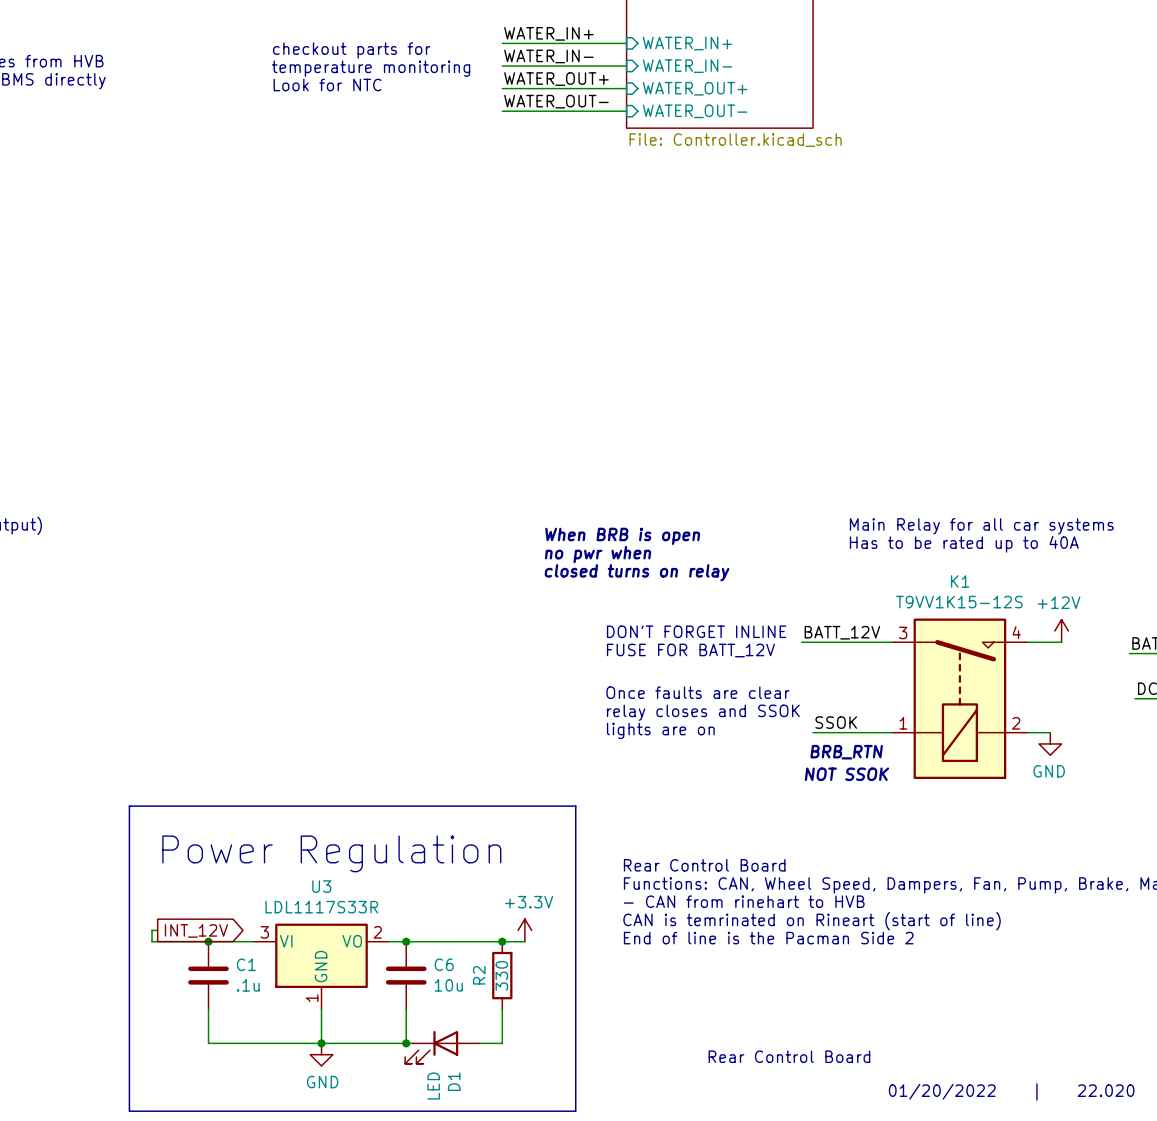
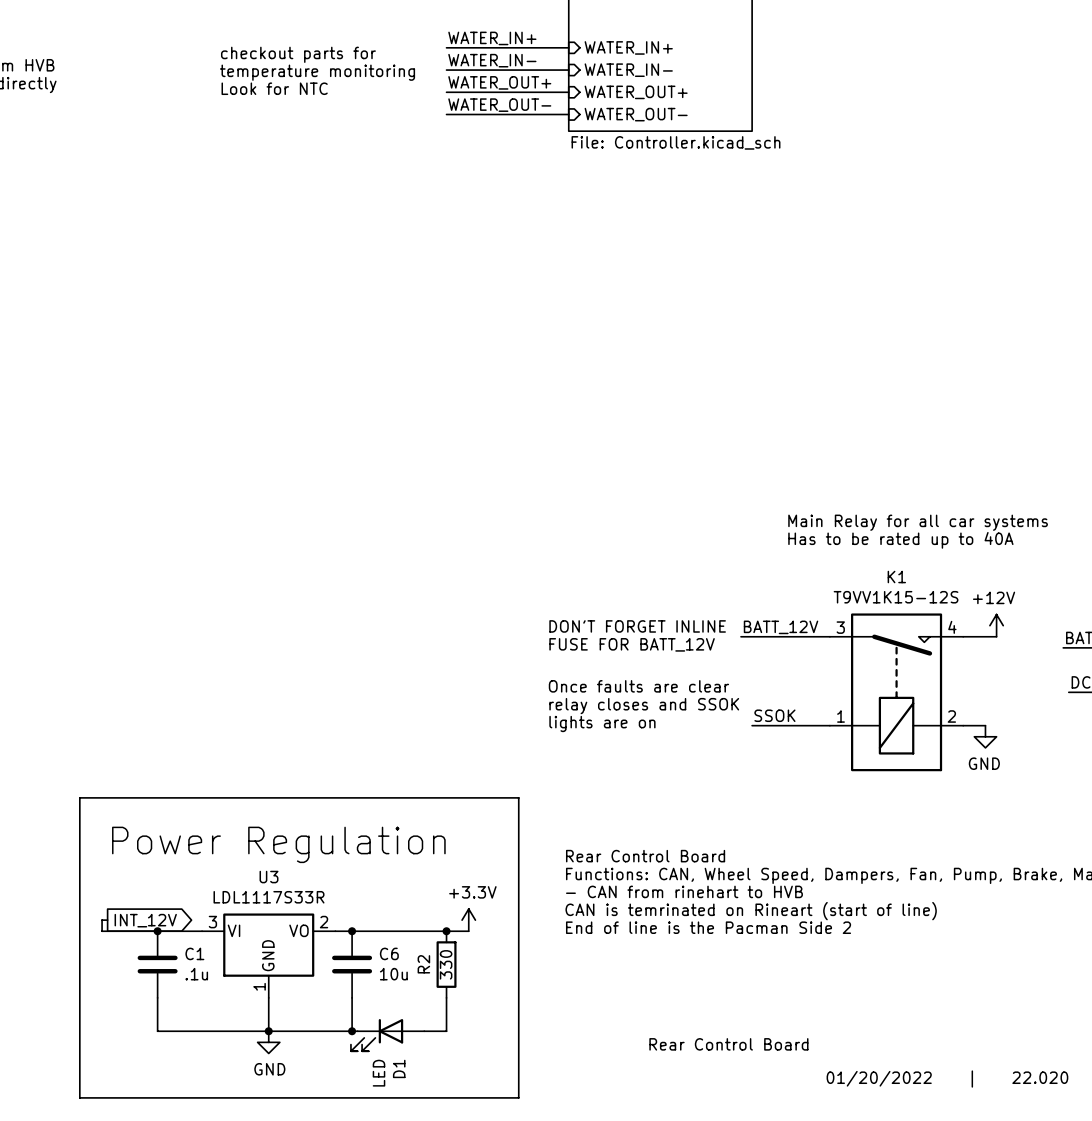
text: When BRB is open (622, 536) -> none
text: no pwr when (598, 554) -> none
text: closed turns on relay (637, 572) -> none
text: BRB_RTN (846, 752) -> none
text: NOT SSOK (846, 774) -> none

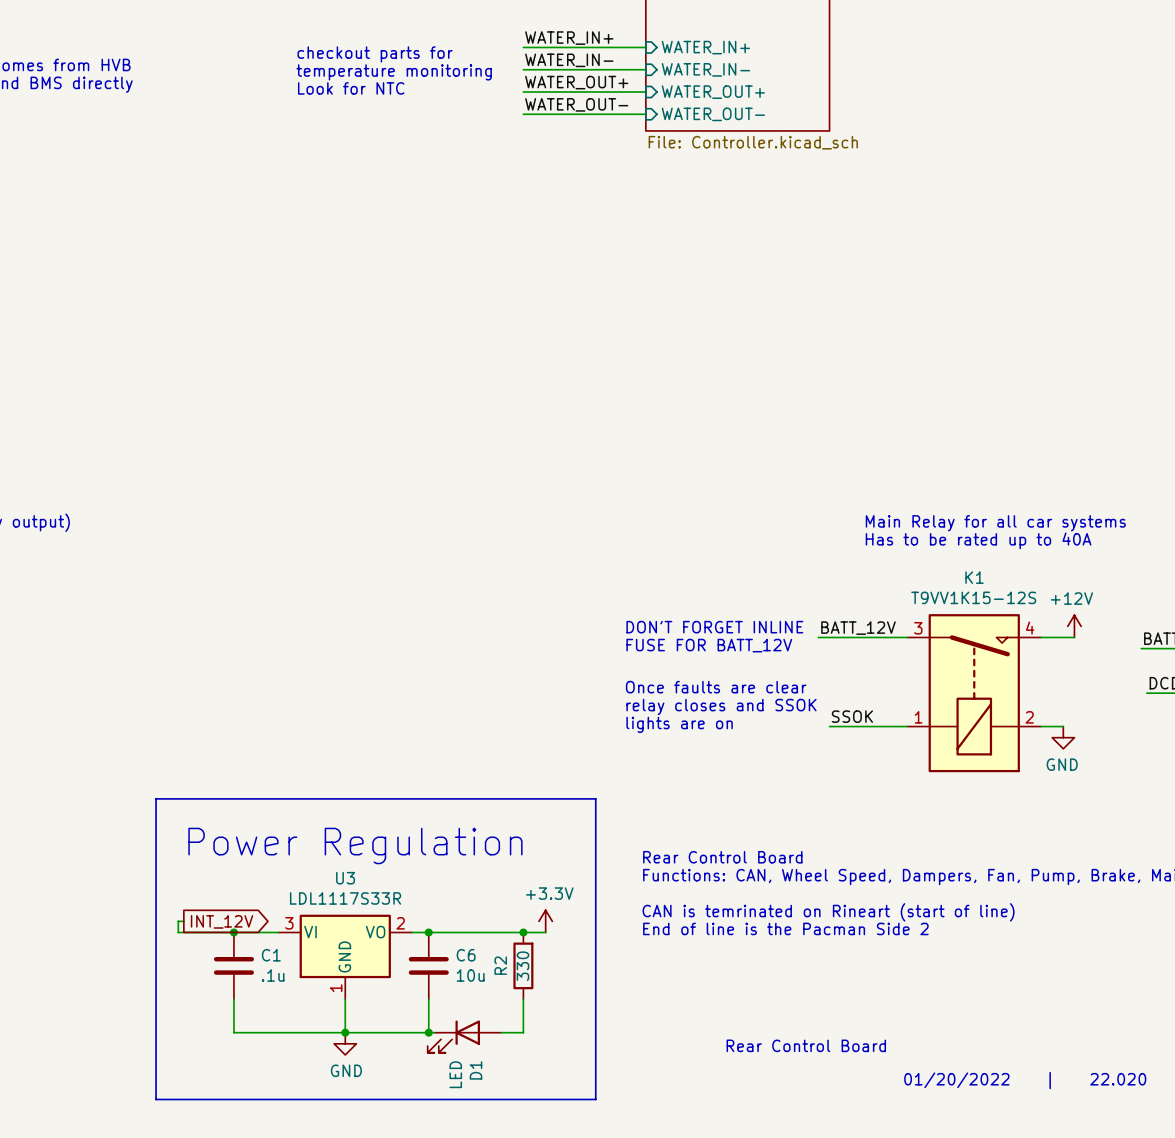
text: - CAN from rinehart to HVB (684, 891) -> none

